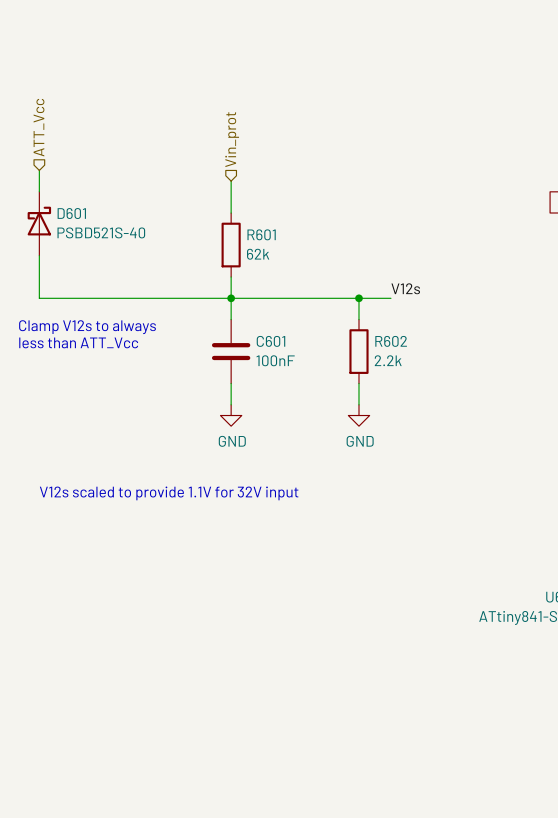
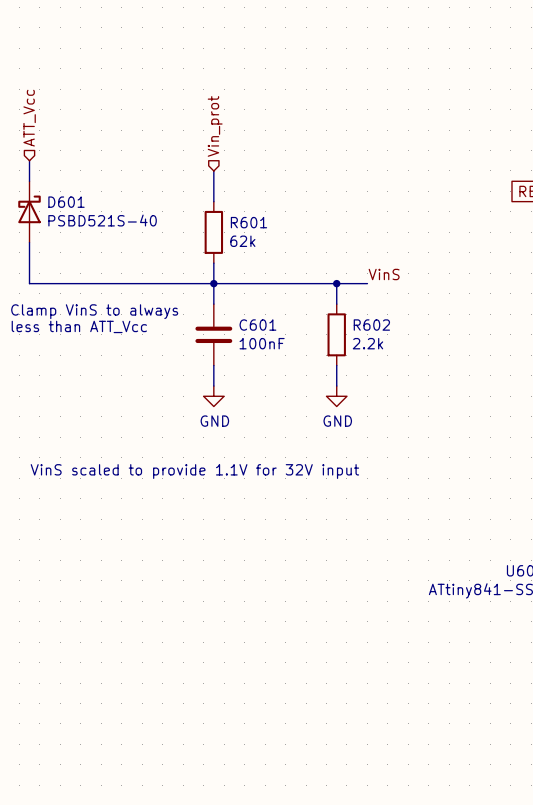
label: V12s (405, 288) -> VinS (384, 274)
text: Clamp V12s to always (87, 327) -> Clamp VinS to always (94, 311)
text: V12s scaled to provide 1.1V for 32V input (169, 493) -> VinS scaled to provide 1.1V for 32V input (194, 471)

